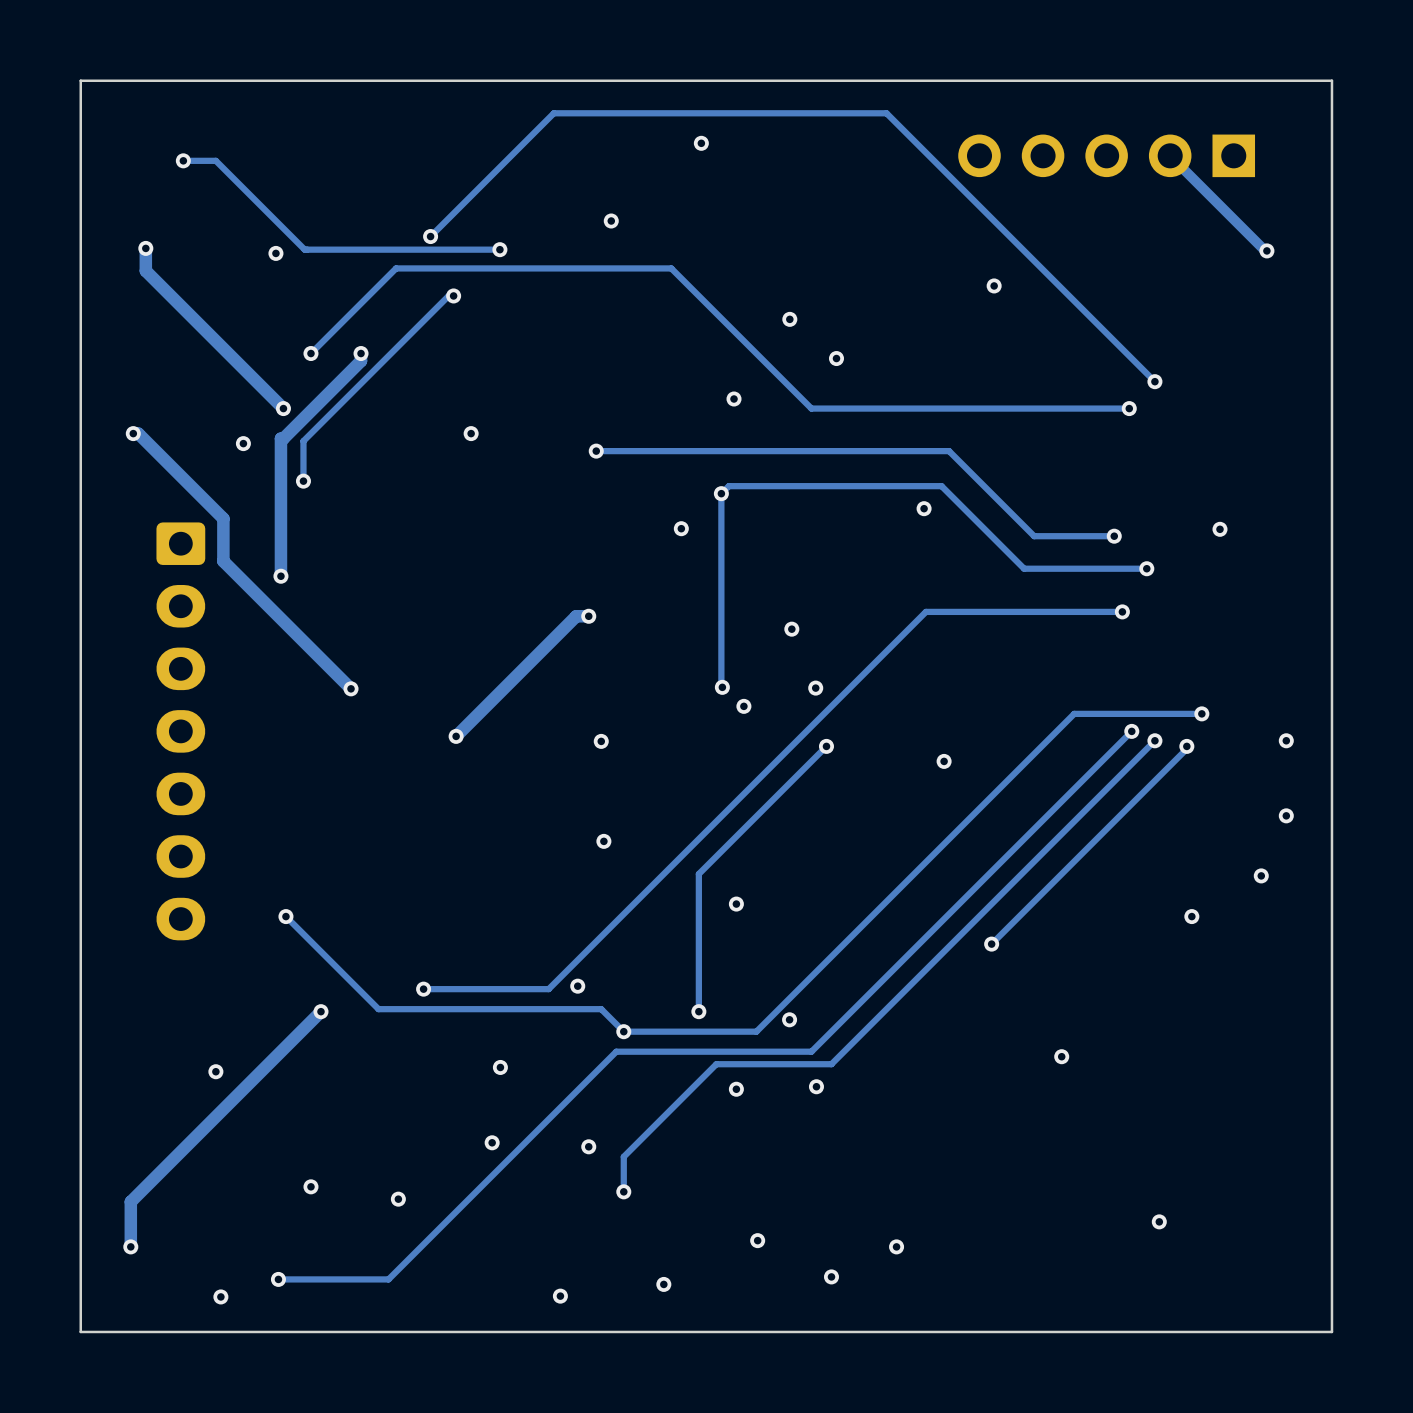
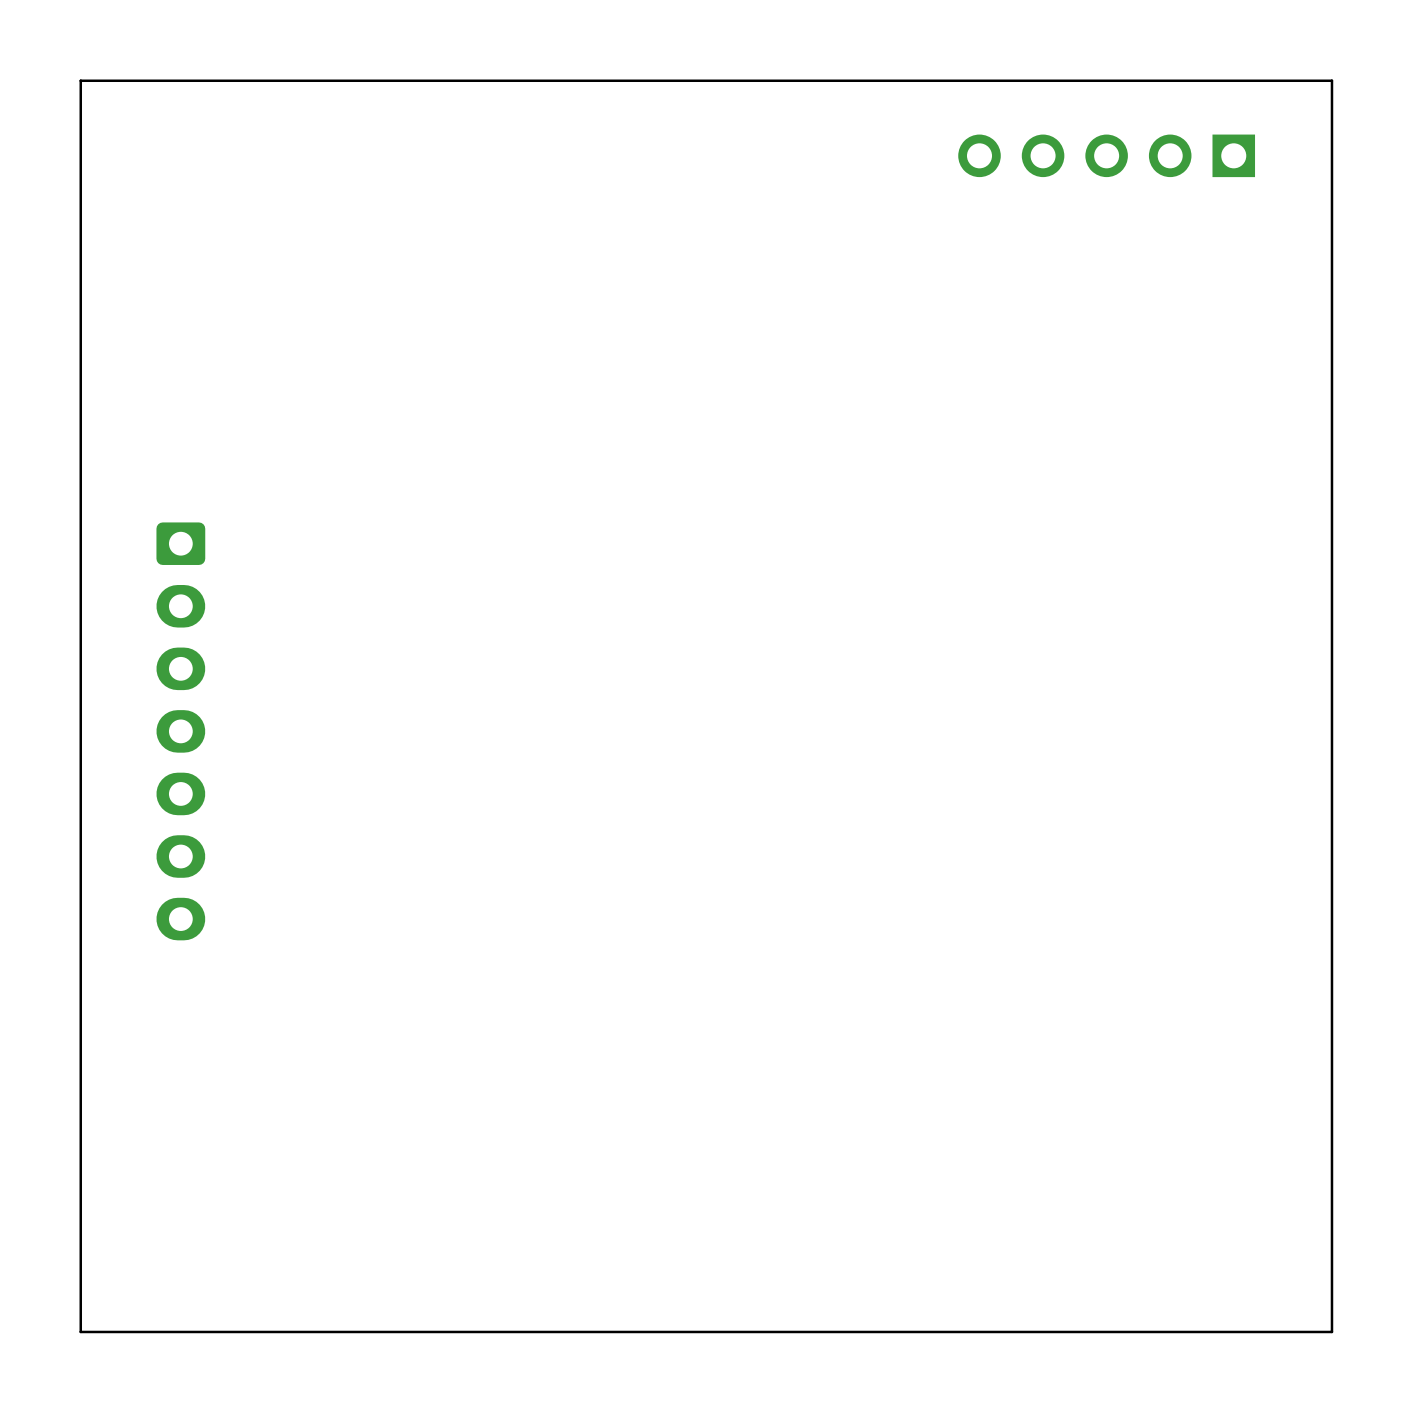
via: (701, 143) -> none
track: (1170, 155) (1266, 250) -> none
track: (183, 160) (215, 160) (304, 249) (499, 249) -> none
via: (183, 160) -> none
via: (611, 221) -> none
track: (430, 236) (553, 113) (886, 113) (1154, 381) -> none
via: (430, 236) -> none
track: (145, 248) (145, 270) (283, 408) -> none
via: (145, 248) -> none
via: (499, 249) -> none
via: (1266, 250) -> none
via: (275, 253) -> none
via: (994, 285) -> none
track: (453, 295) (448, 295) (303, 441) (303, 481) -> none
via: (453, 295) -> none
via: (789, 319) -> none
track: (310, 353) (396, 268) (671, 268) (811, 408) (1129, 408) -> none
via: (310, 353) -> none
track: (361, 353) (361, 361) (283, 438) (280, 438) (280, 576) -> none
via: (361, 353) -> none
via: (836, 358) -> none
via: (1154, 381) -> none
via: (734, 399) -> none
via: (283, 408) -> none
via: (1129, 408) -> none
track: (133, 433) (138, 433) (223, 518) (223, 561) (351, 688) -> none
via: (133, 433) -> none
via: (471, 433) -> none
via: (243, 443) -> none
track: (596, 451) (949, 451) (1034, 536) (1114, 536) -> none
via: (596, 451) -> none
via: (303, 481) -> none
via: (721, 493) -> none
via: (924, 508) -> none
via: (681, 528) -> none
via: (1219, 529) -> none
via: (1114, 536) -> none
track: (1146, 568) (1024, 568) (941, 486) (728, 486) (721, 493) (722, 687) -> none
via: (1146, 568) -> none
via: (280, 576) -> none
track: (1122, 611) (925, 611) (548, 989) (423, 989) -> none
via: (1122, 611) -> none
track: (588, 616) (576, 616) (456, 736) -> none
via: (588, 616) -> none
via: (791, 629) -> none
via: (722, 687) -> none
via: (351, 688) -> none
via: (815, 688) -> none
via: (743, 706) -> none
track: (1201, 713) (1074, 713) (756, 1031) (623, 1031) (601, 1009) (378, 1009) (285, 916) -> none
via: (1201, 713) -> none
track: (1131, 731) (811, 1051) (616, 1051) (388, 1279) (278, 1279) -> none
via: (1131, 731) -> none
via: (456, 736) -> none
track: (1154, 740) (831, 1064) (716, 1064) (623, 1156) (623, 1191) -> none
via: (1154, 740) -> none
via: (1286, 740) -> none
via: (601, 741) -> none
track: (826, 746) (698, 874) (698, 1011) -> none
via: (826, 746) -> none
track: (1186, 746) (1186, 748) (991, 944) -> none
via: (1186, 746) -> none
via: (944, 761) -> none
via: (1286, 815) -> none
via: (603, 841) -> none
via: (1261, 875) -> none
via: (736, 904) -> none
via: (285, 916) -> none
via: (1191, 916) -> none
via: (991, 944) -> none
via: (577, 986) -> none
via: (423, 989) -> none
track: (320, 1011) (130, 1201) (130, 1246) -> none
via: (320, 1011) -> none
via: (698, 1011) -> none
via: (789, 1019) -> none
via: (623, 1031) -> none
via: (1061, 1056) -> none
via: (500, 1067) -> none
via: (215, 1071) -> none
via: (816, 1086) -> none
via: (736, 1089) -> none
via: (492, 1142) -> none
via: (588, 1146) -> none
via: (310, 1186) -> none
via: (623, 1191) -> none
via: (398, 1199) -> none
via: (1159, 1221) -> none
via: (757, 1240) -> none
via: (130, 1246) -> none
via: (896, 1246) -> none
via: (831, 1276) -> none
via: (278, 1279) -> none
via: (663, 1284) -> none
via: (220, 1296) -> none
via: (560, 1296) -> none

